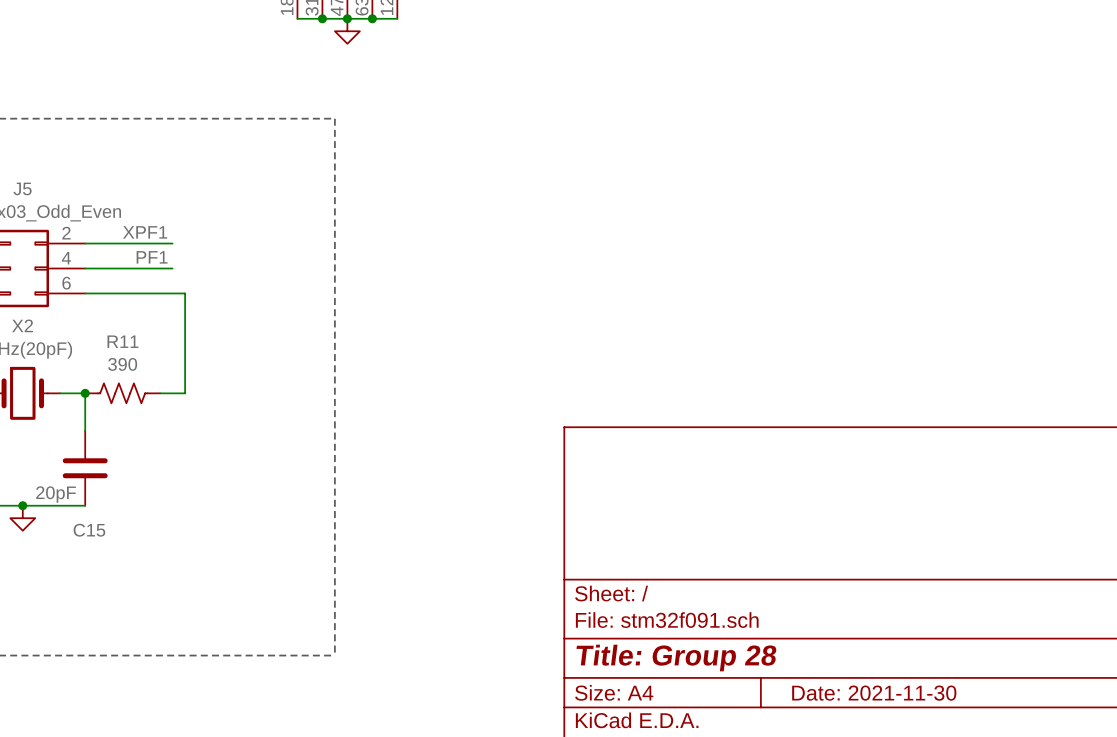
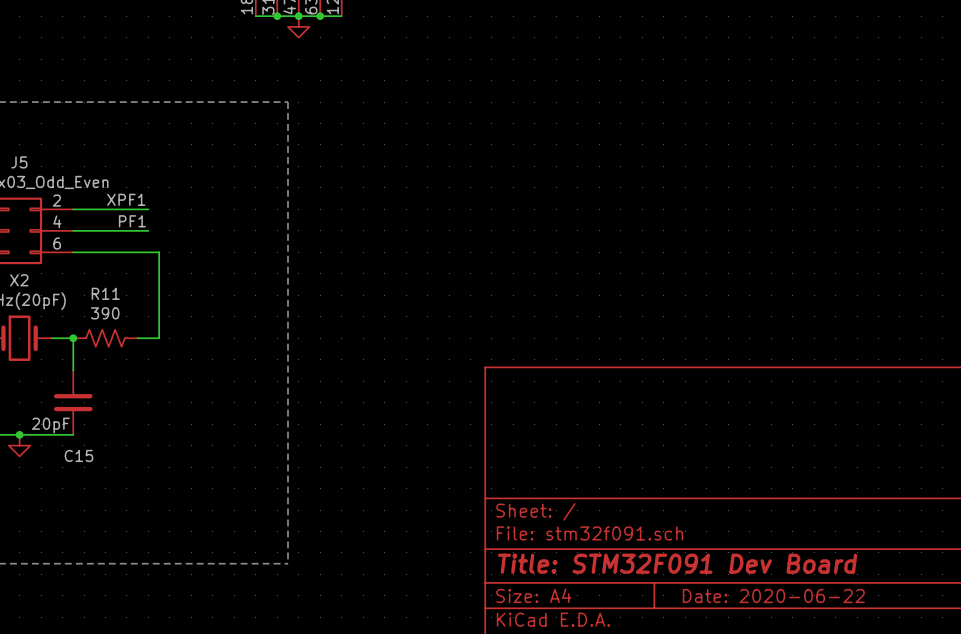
title block: Title: Group 28 (676, 658) -> Title: STM32F091 Dev Board (677, 563)
title block: Date: 2021-11-30 (874, 693) -> Date: 2020-06-22 (773, 596)

